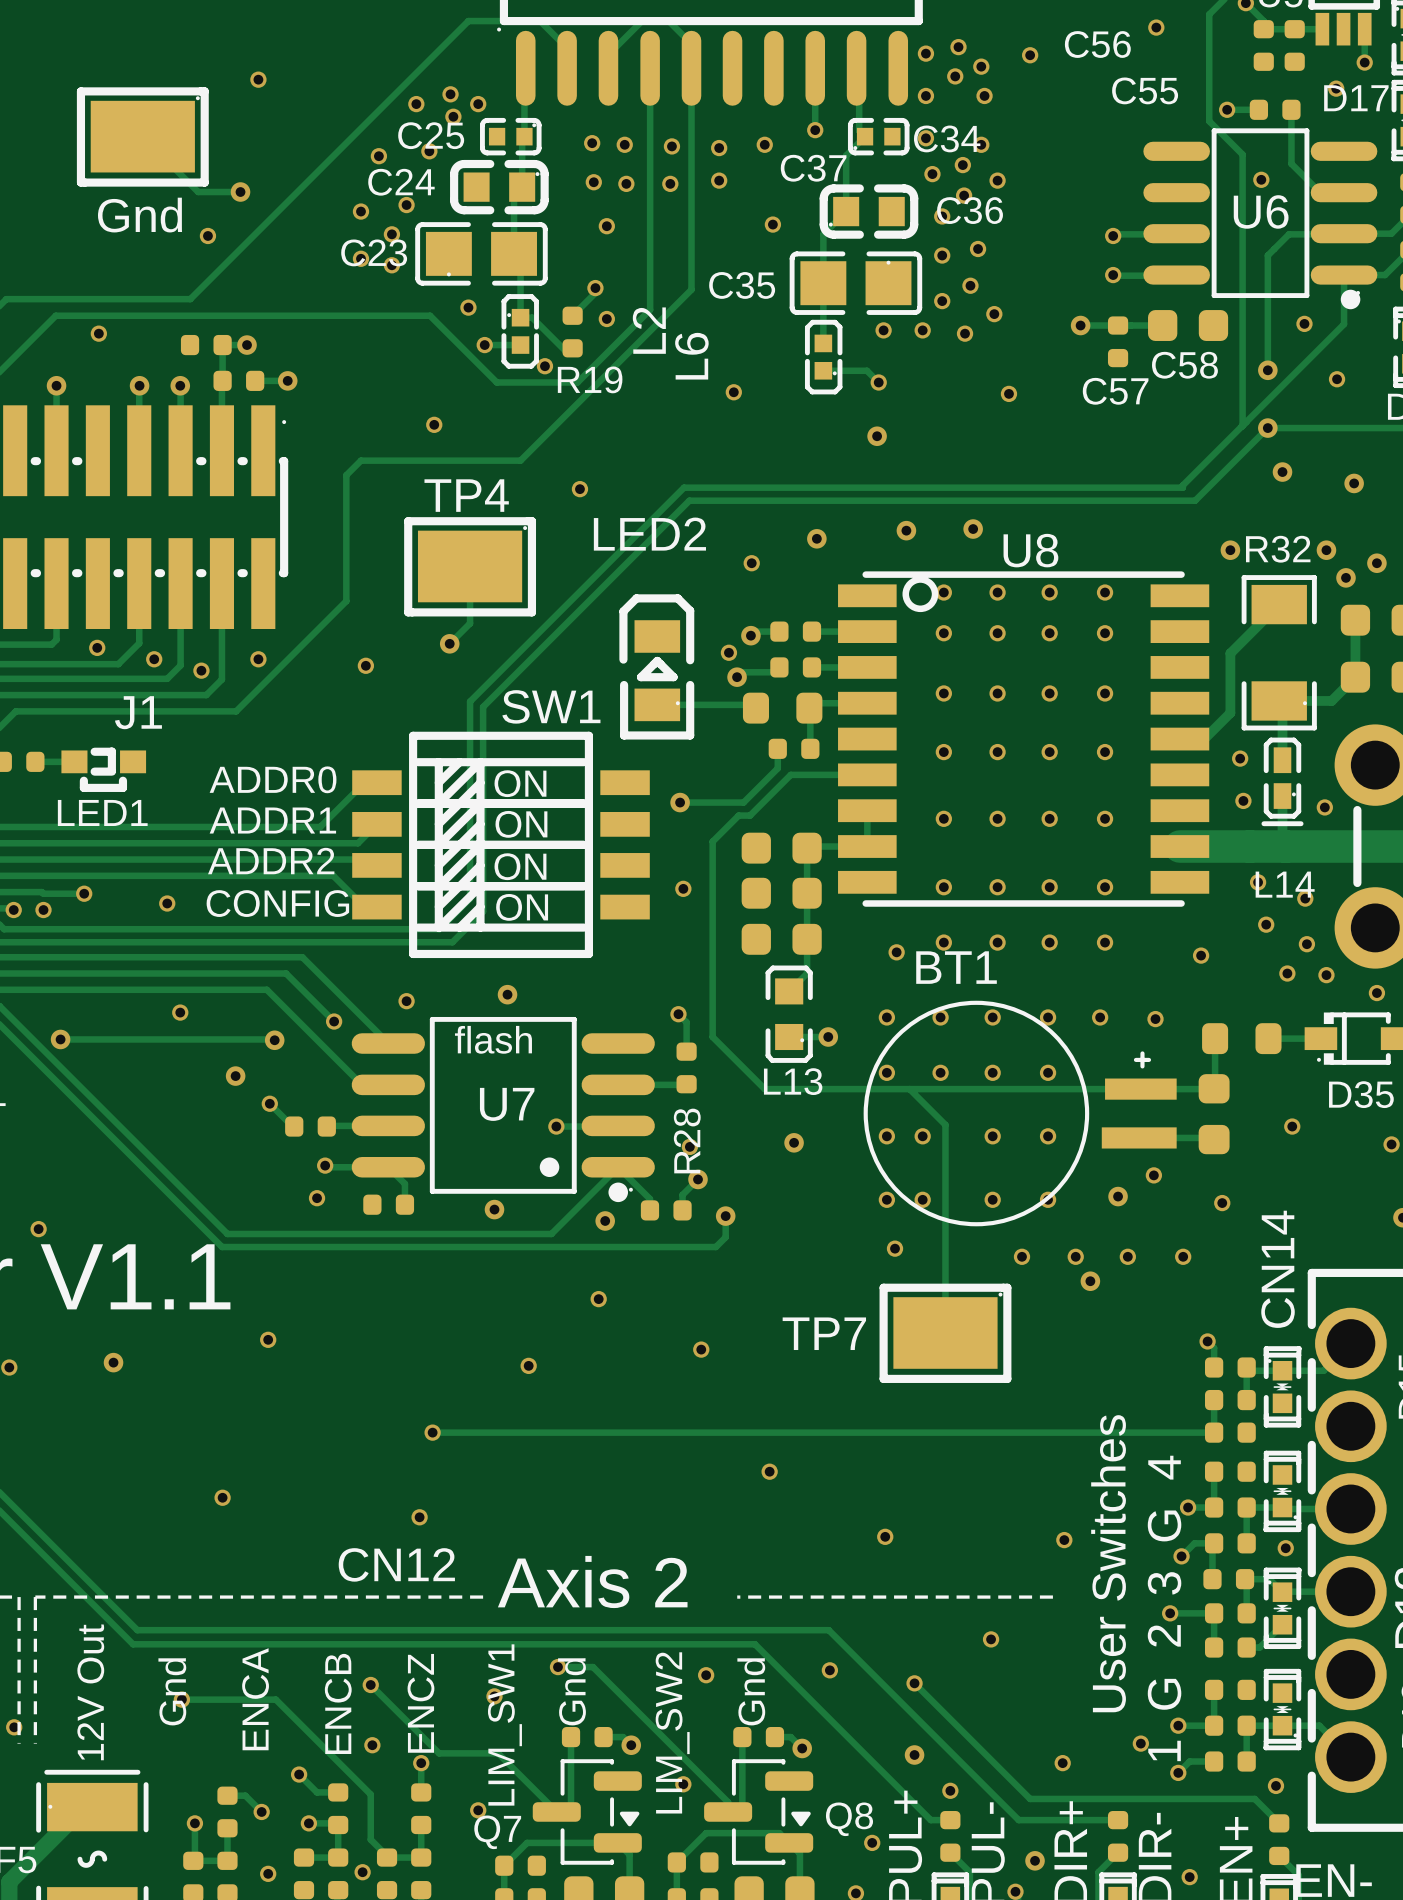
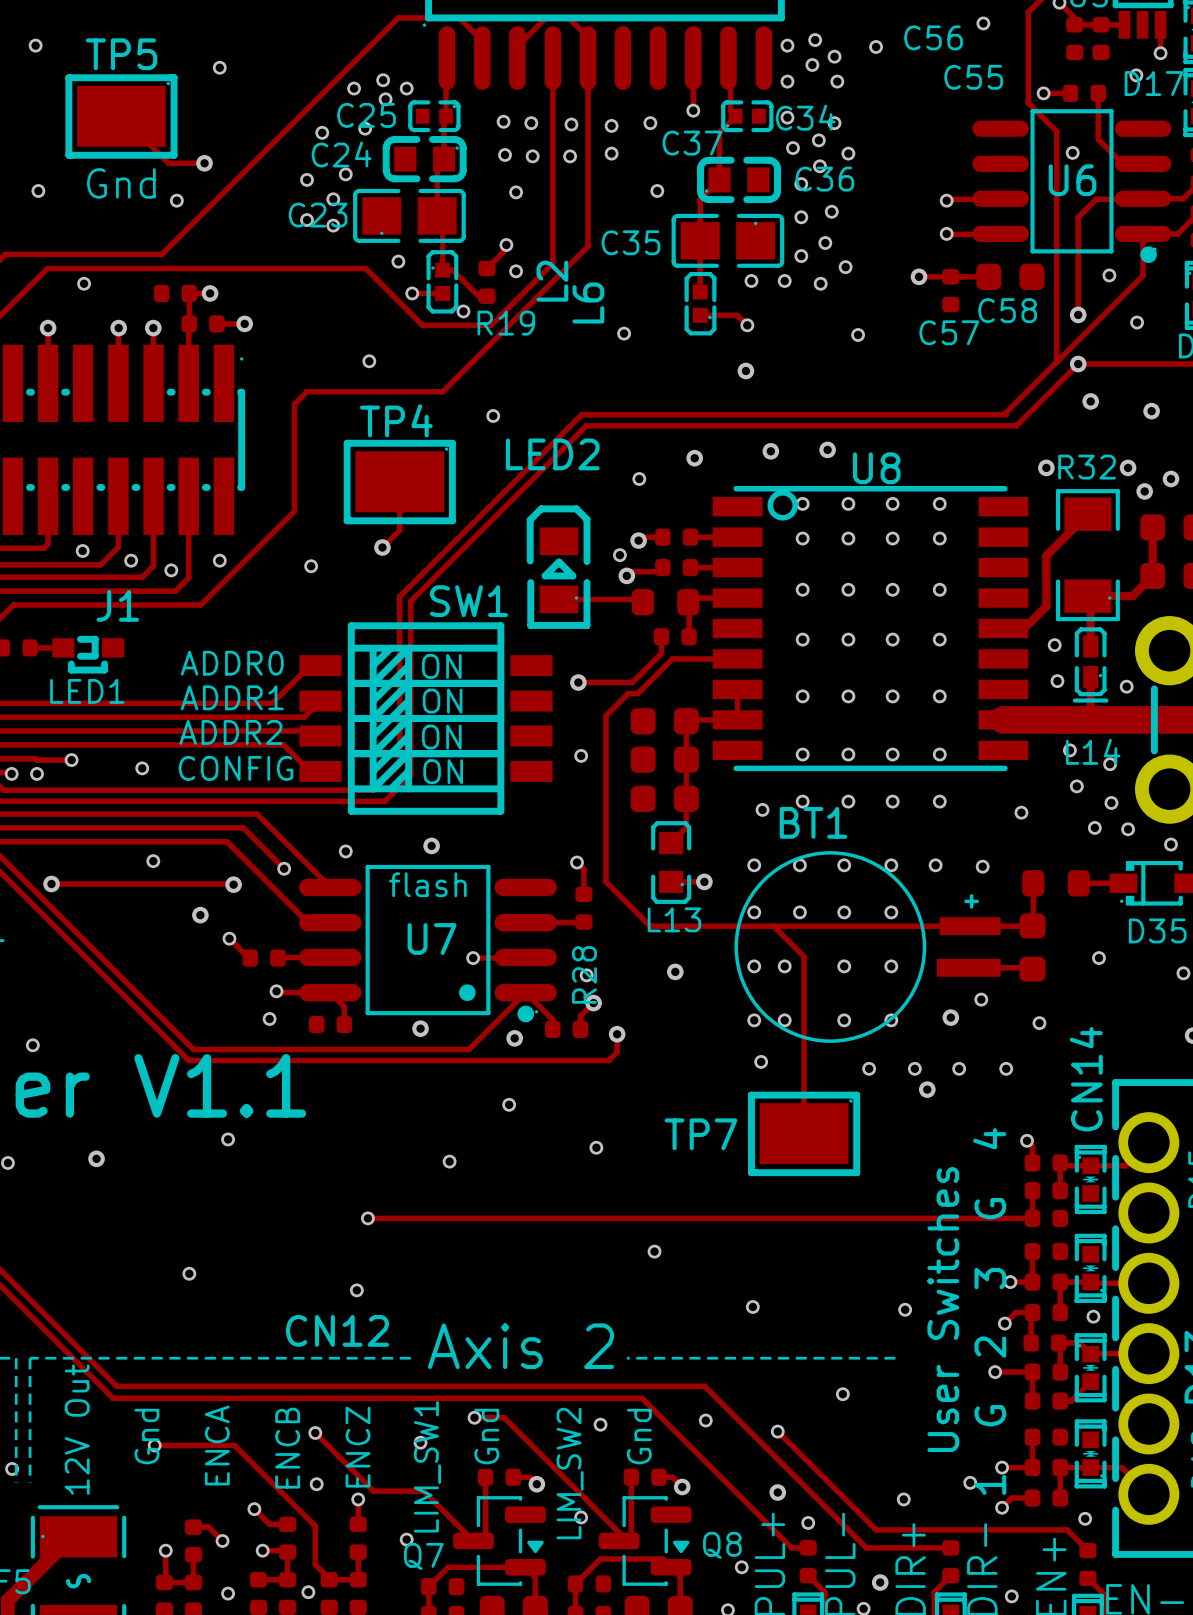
via: none -> (35, 45)
TP5 name: none -> TP5 (121, 54)
via: none -> (38, 190)

